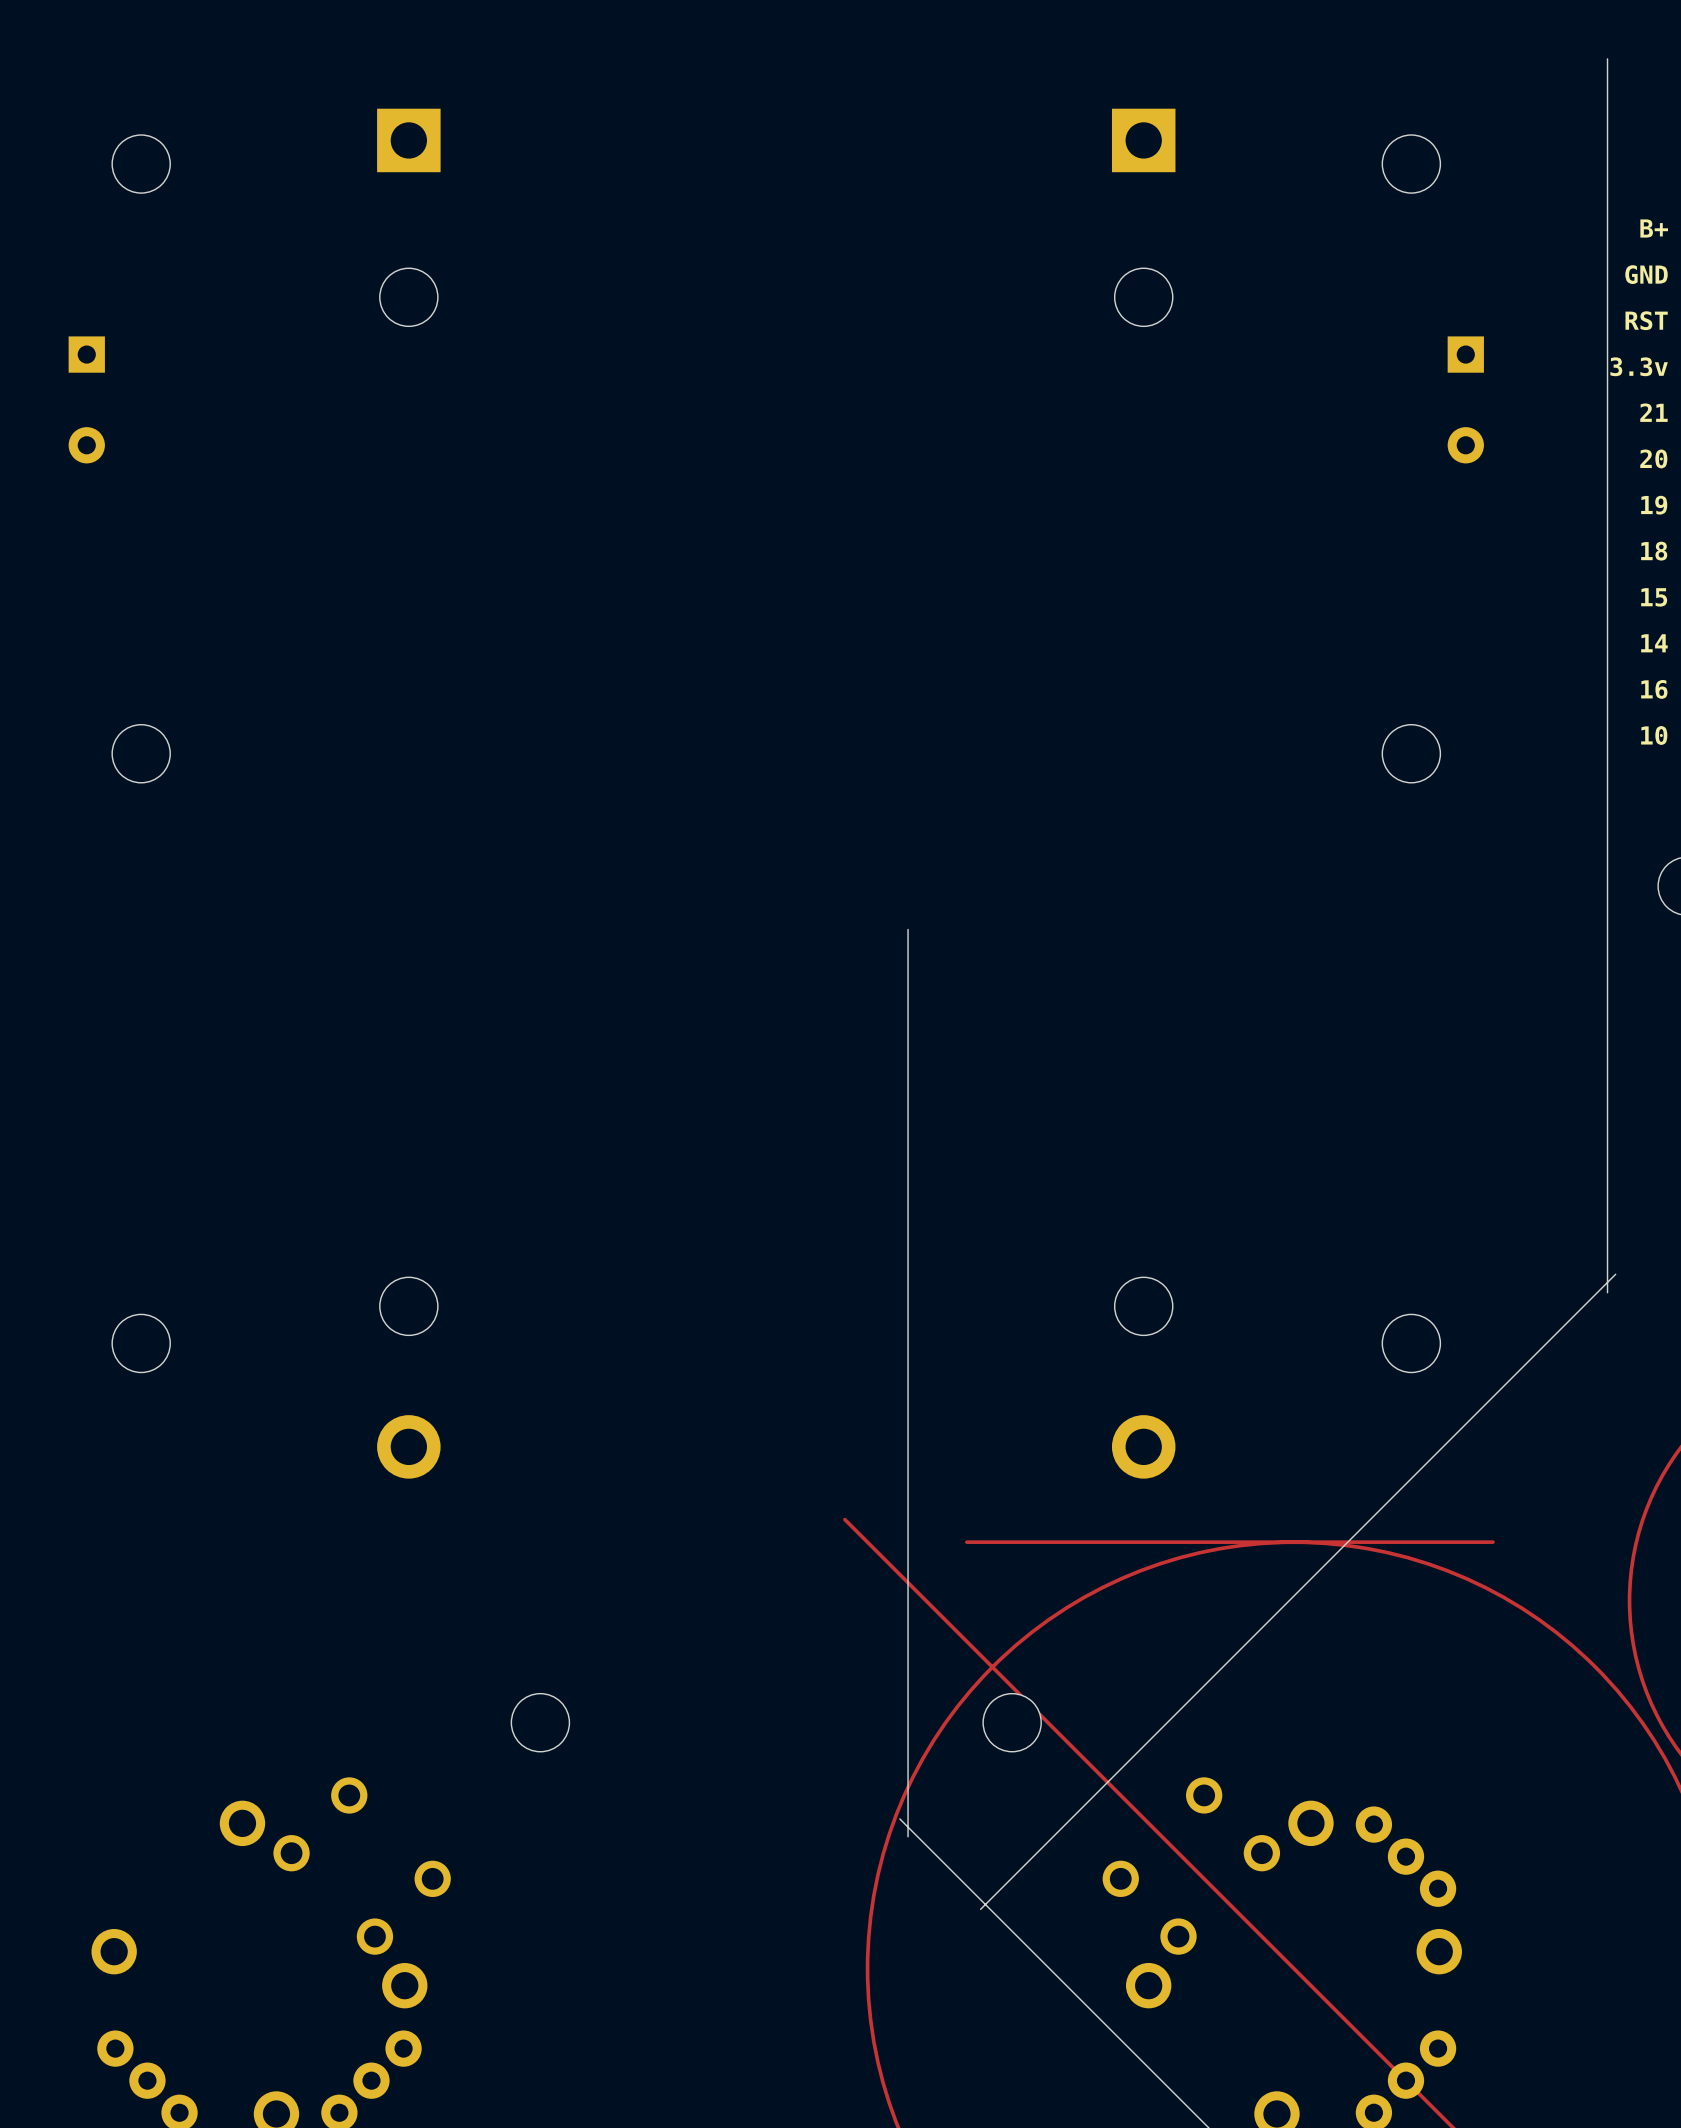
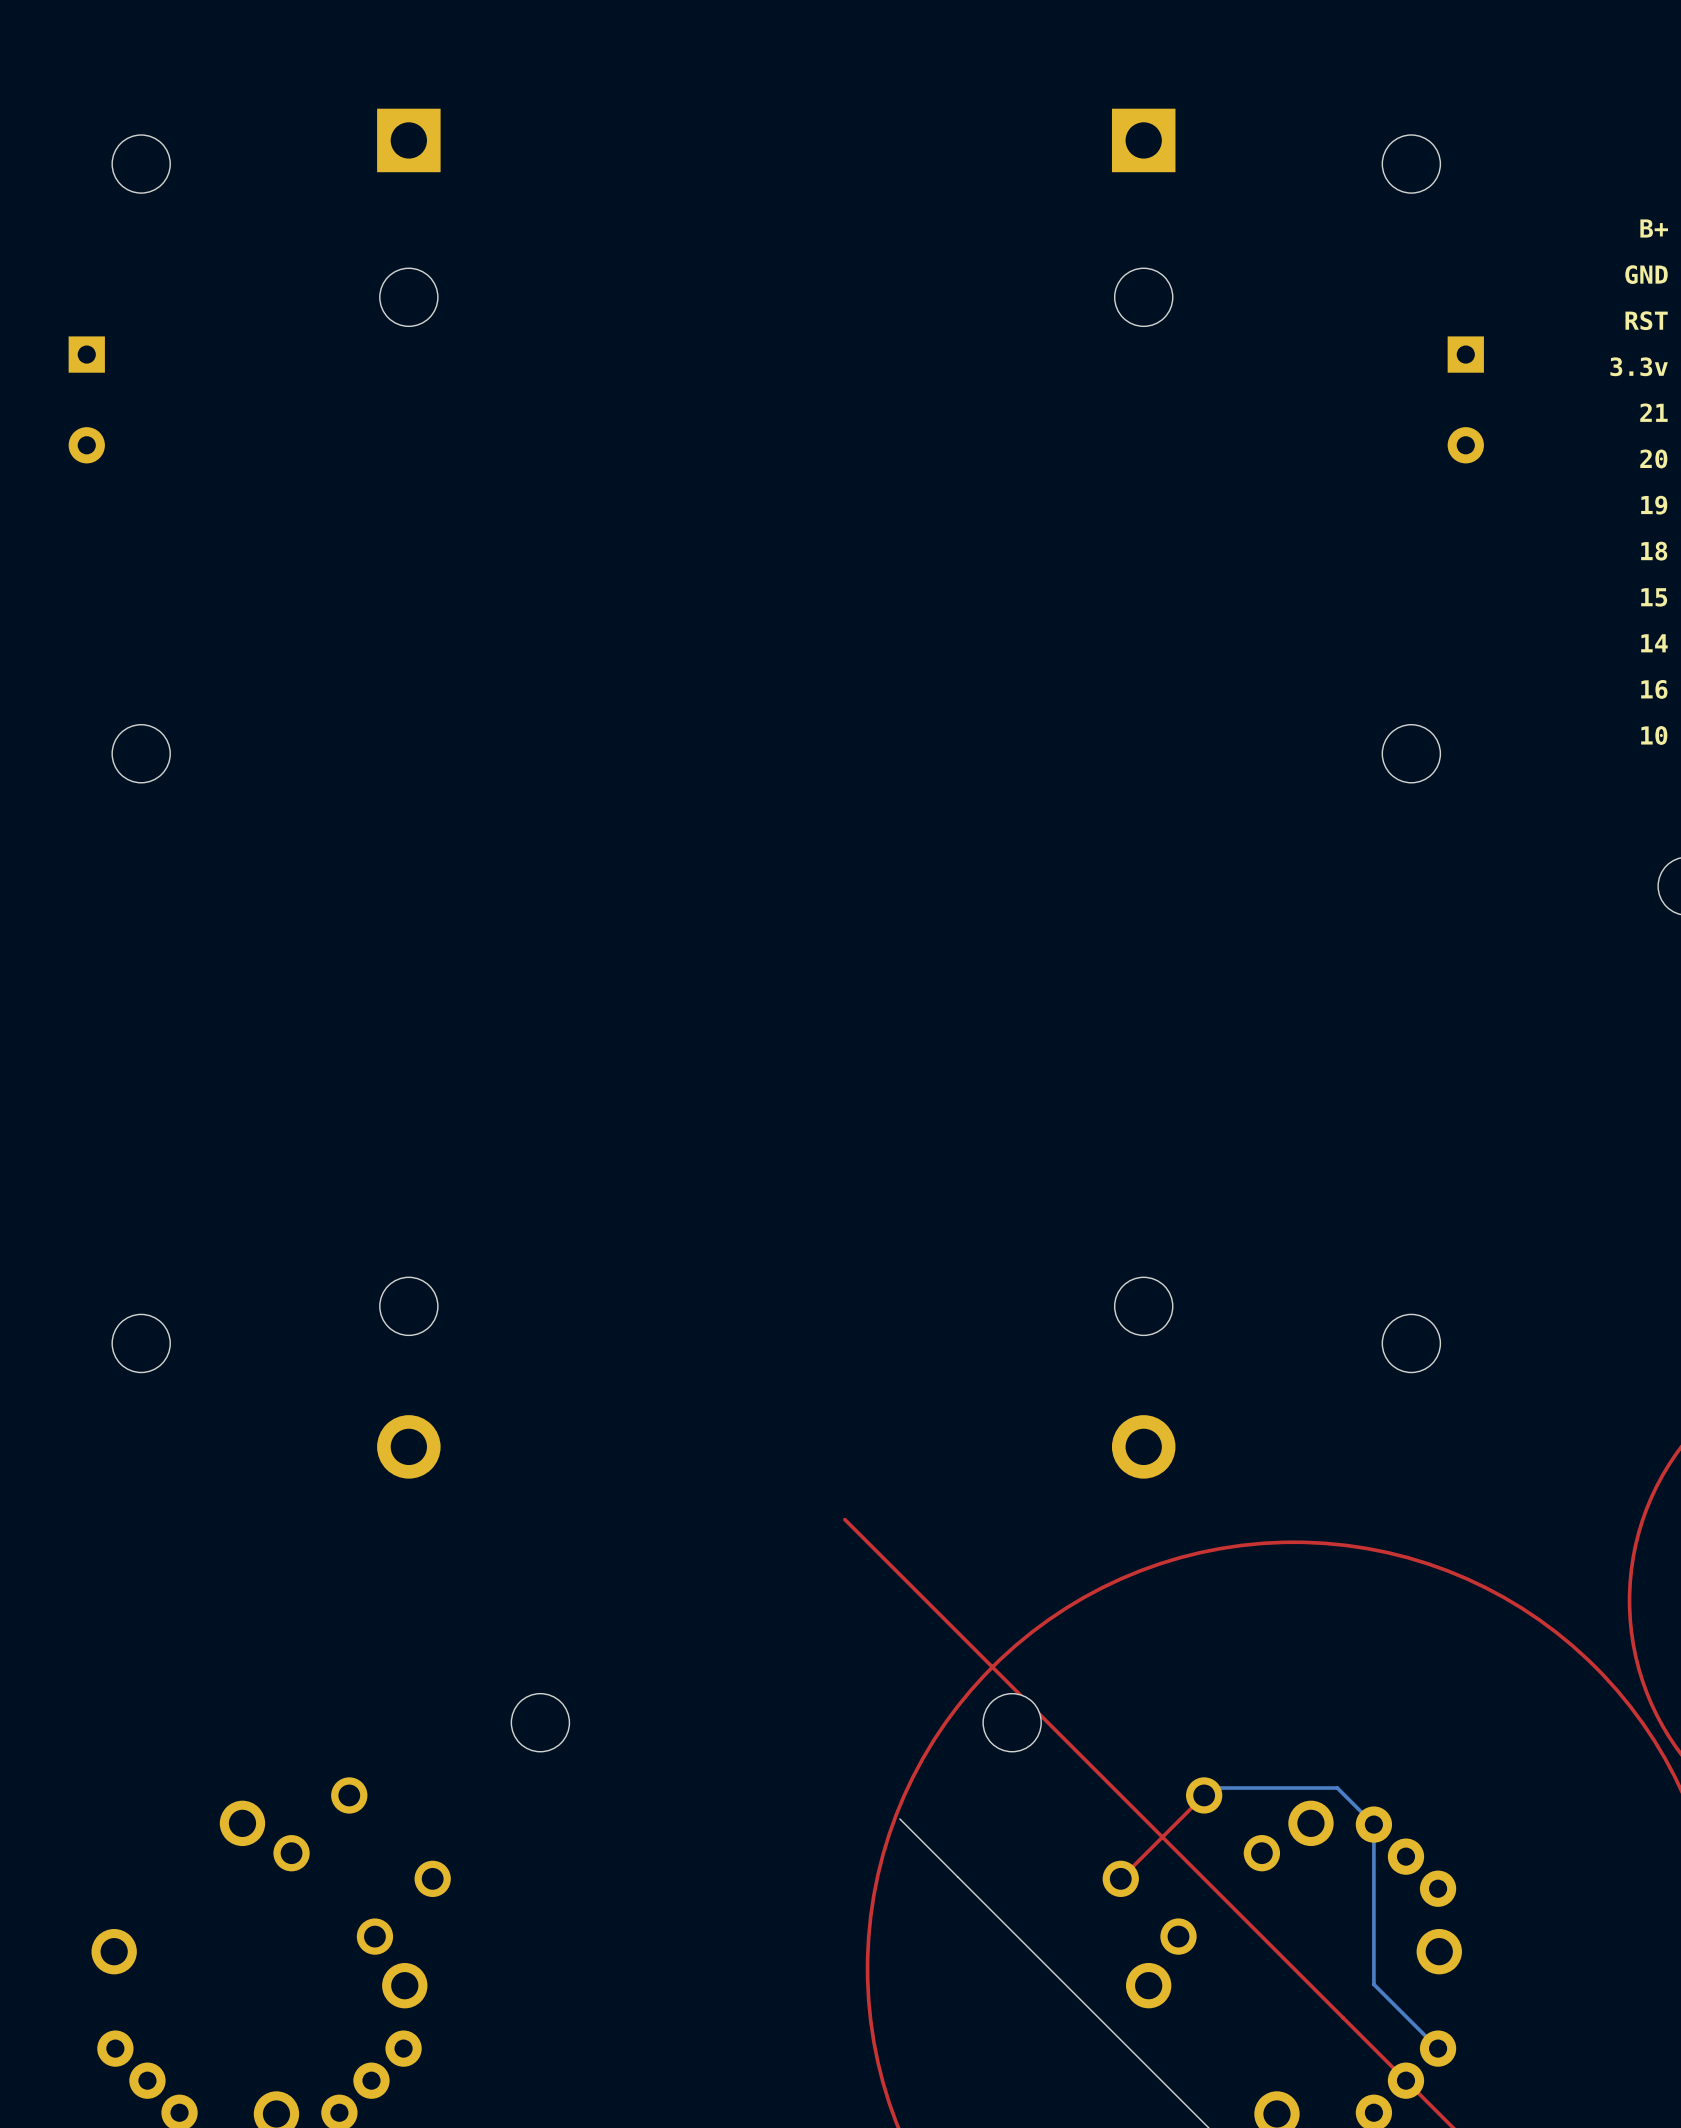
board edge: (1607, 58) (1607, 1292) -> none
board edge: (908, 929) (908, 1836) -> none
board edge: (1615, 1274) (980, 1909) -> none
top track: (1493, 1542) (966, 1542) -> none
top track: none -> (1204, 1795) (1120, 1878)
bottom track: none -> (1204, 1795) (1211, 1788) (1337, 1788) (1373, 1824) (1373, 1984) (1438, 2048)

